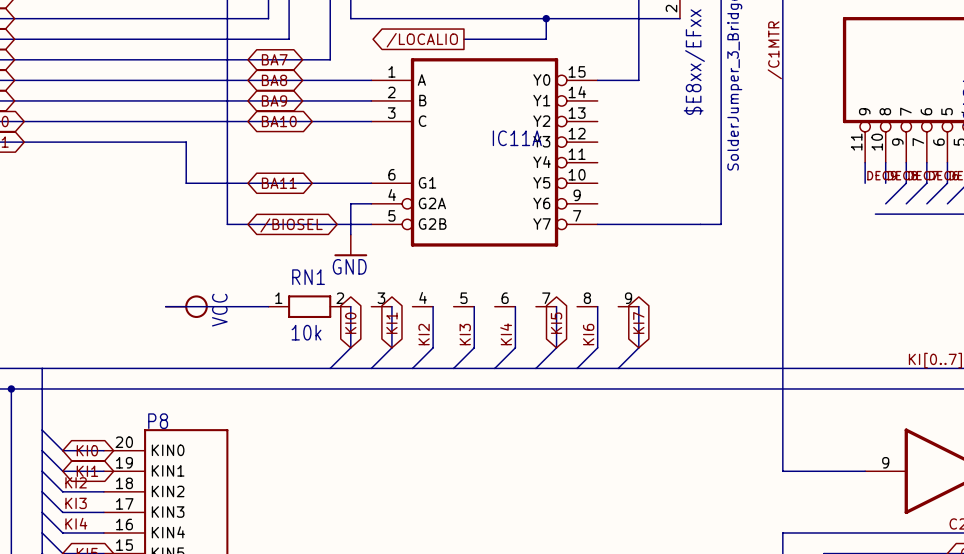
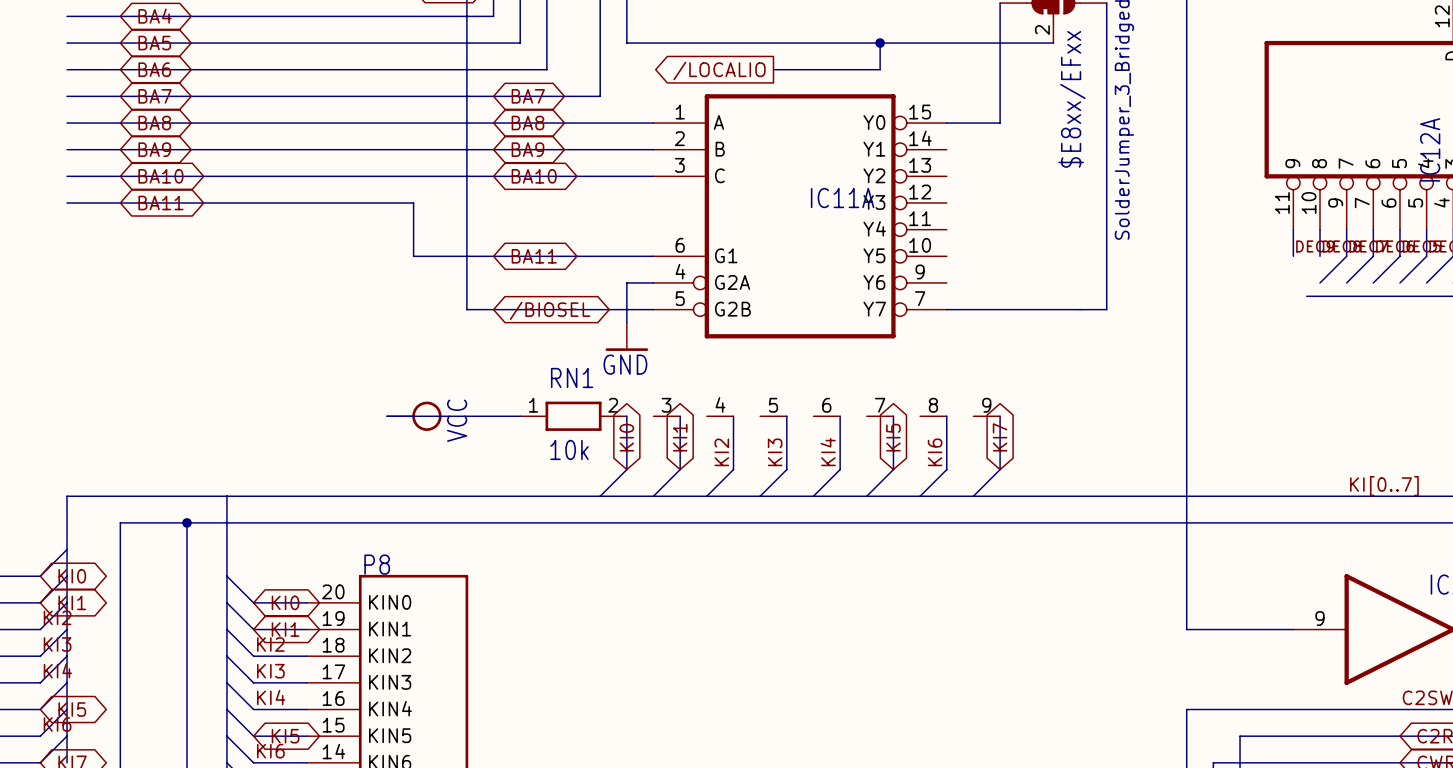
label: /C1MTR (774, 50) -> none

